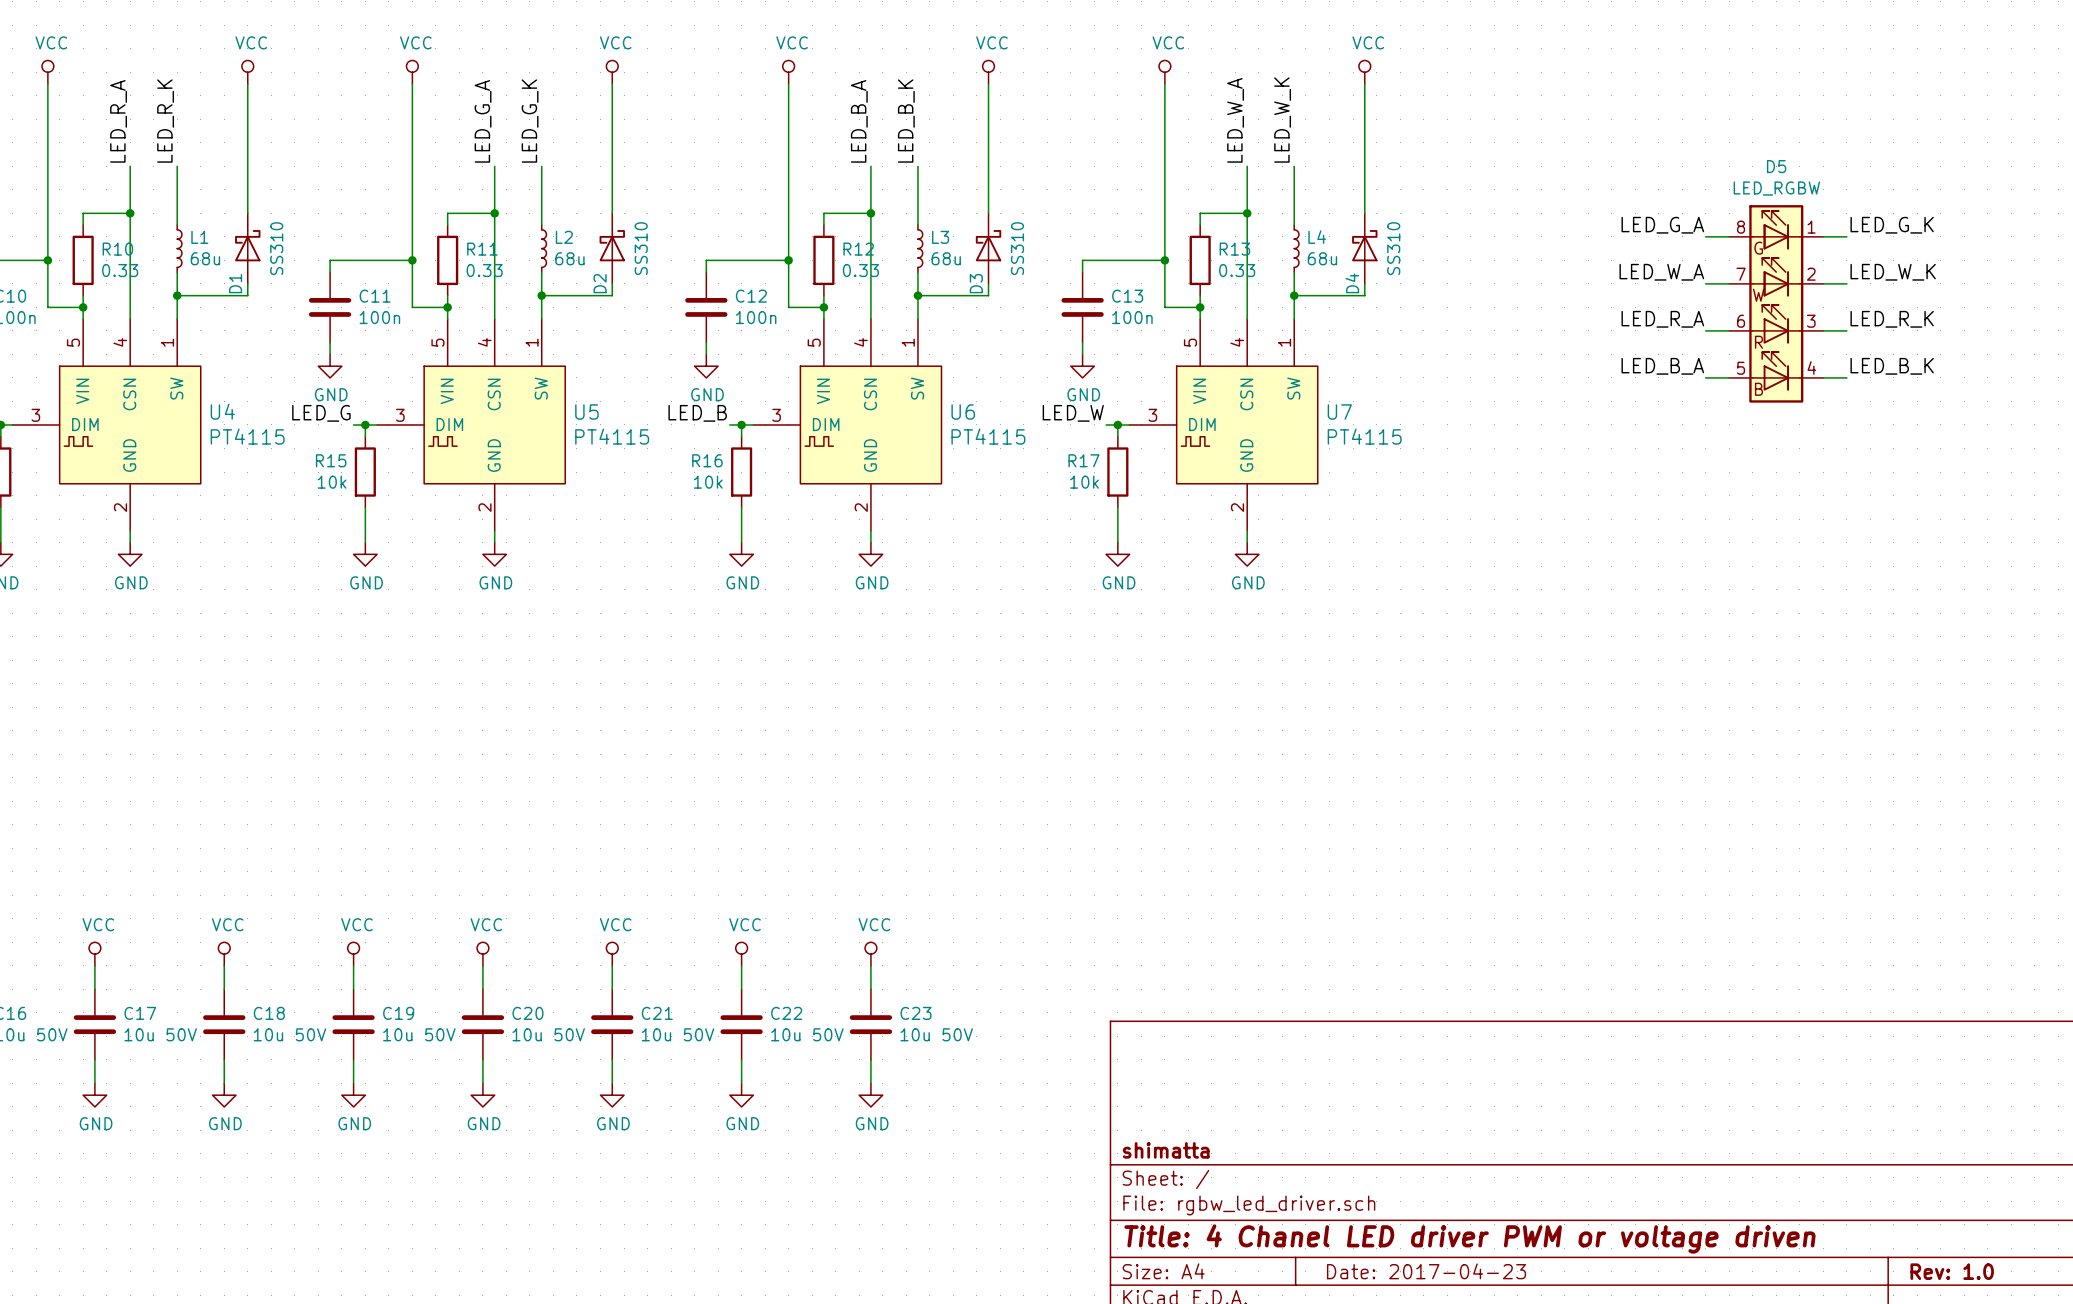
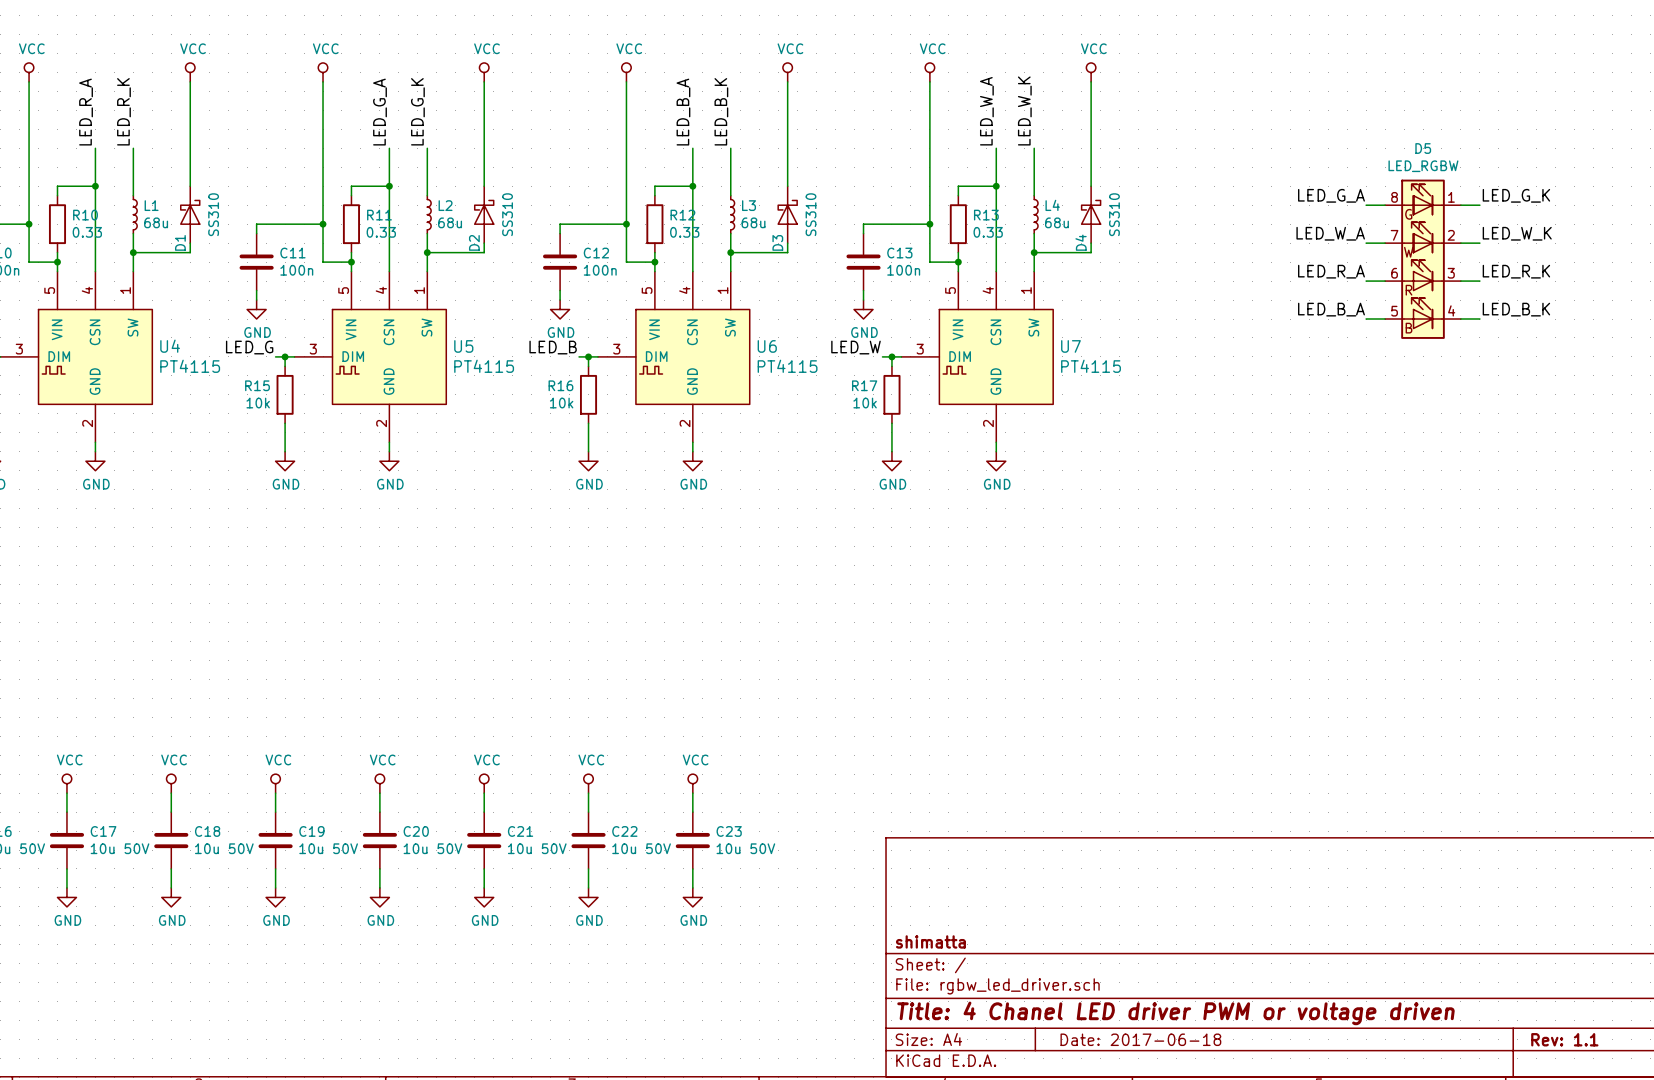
title block: Date: 2017-04-23 (1426, 1271) -> Date: 2017-06-18 (1140, 1039)
title block: Rev: 1.0 (1952, 1271) -> Rev: 1.1 (1564, 1039)

